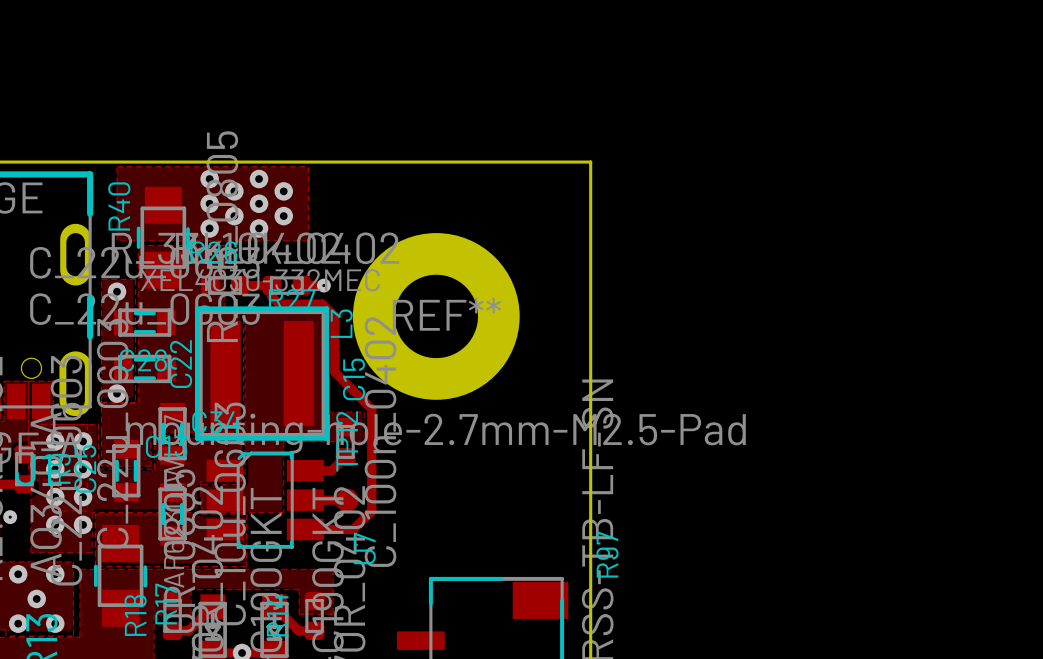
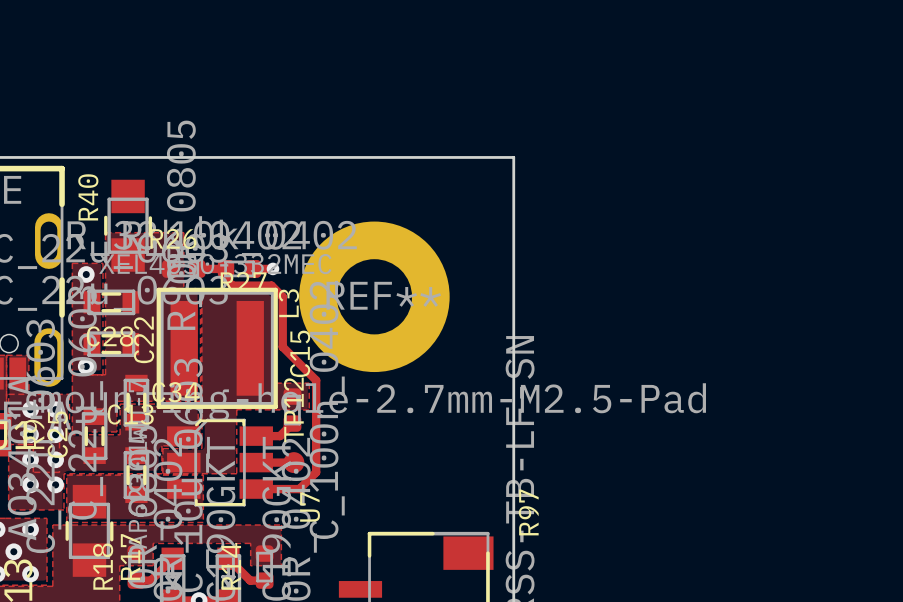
zone outline: (117, 166) (117, 240) (308, 240) (308, 166) (117, 166) -> none
via: (209, 179) -> none
via: (259, 179) -> none
via: (234, 191) -> none
via: (283, 191) -> none
via: (209, 203) -> none
via: (259, 203) -> none
via: (234, 216) -> none
via: (283, 216) -> none
via: (209, 228) -> none
via: (259, 228) -> none

